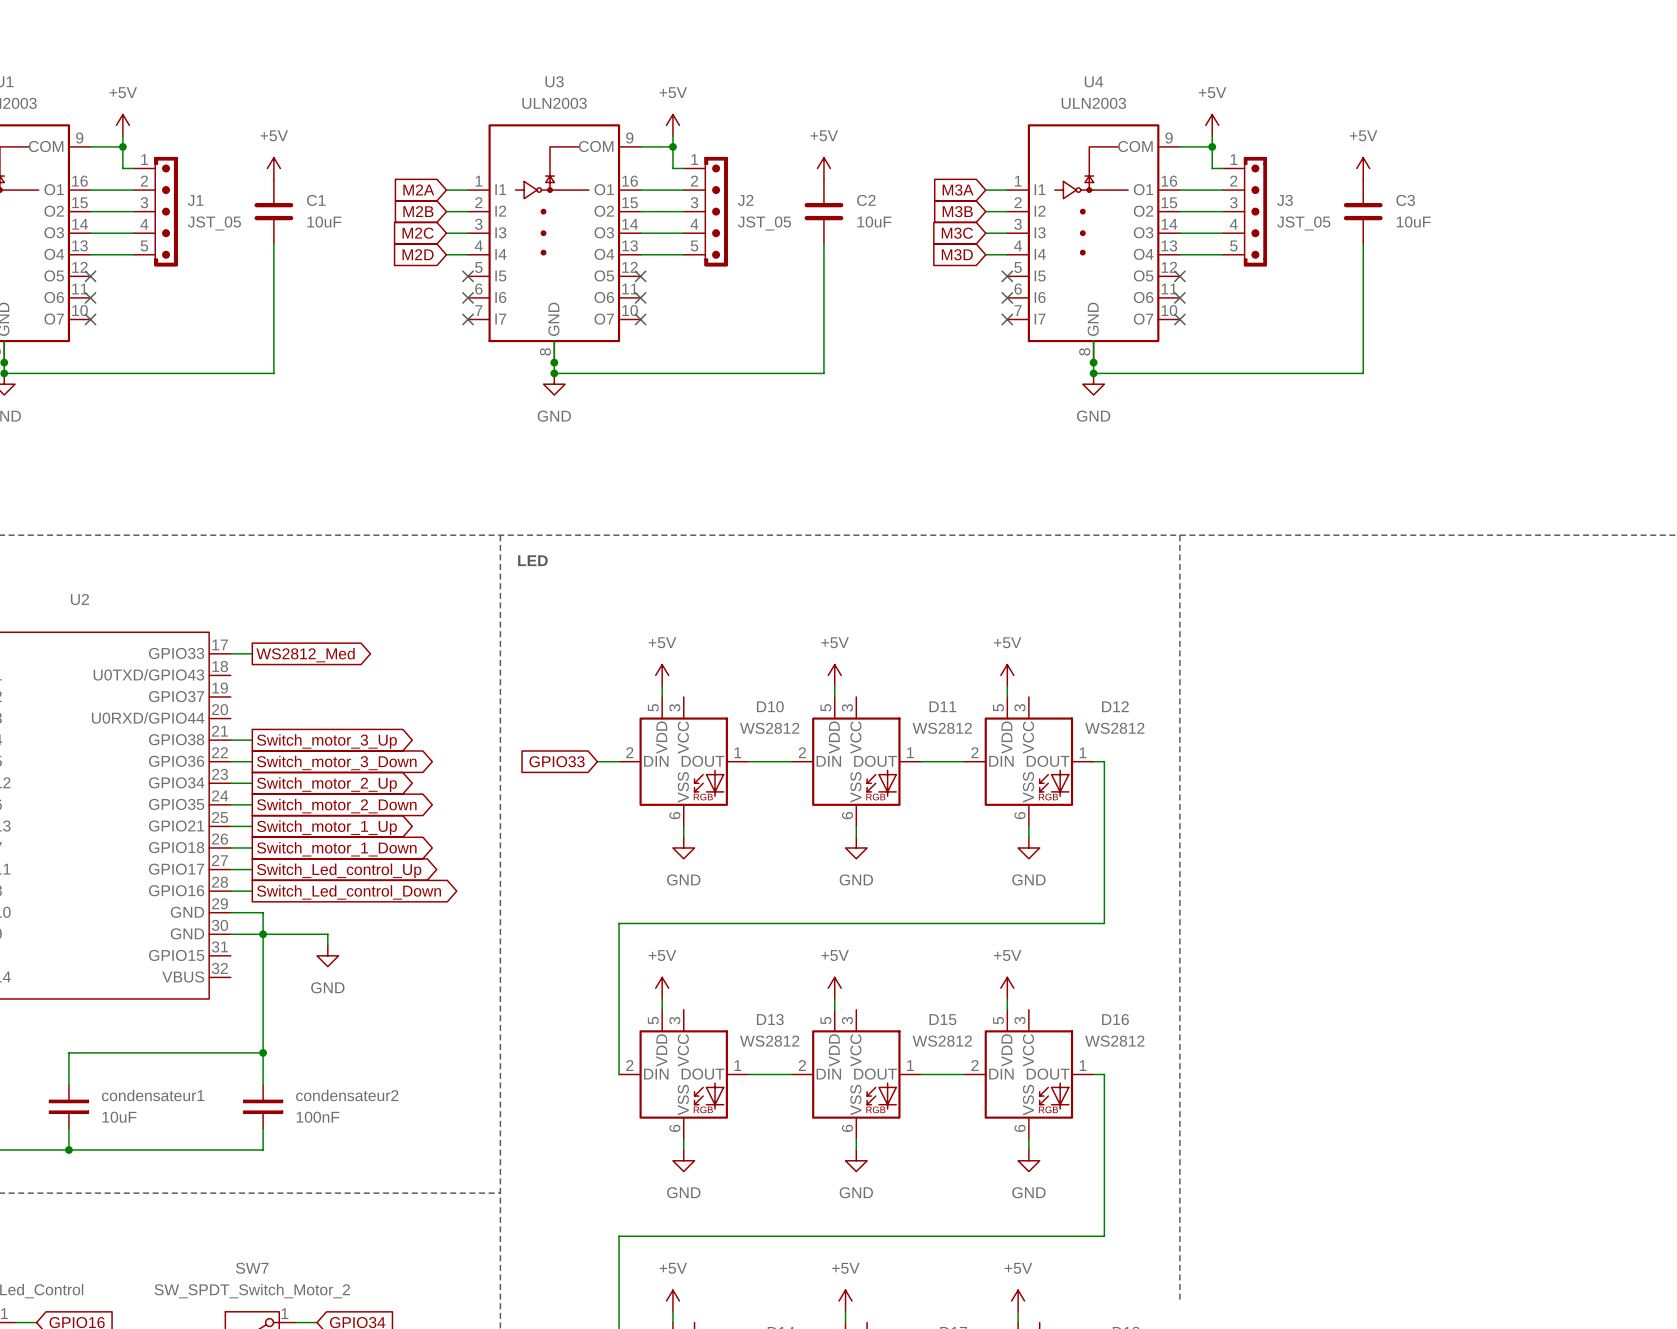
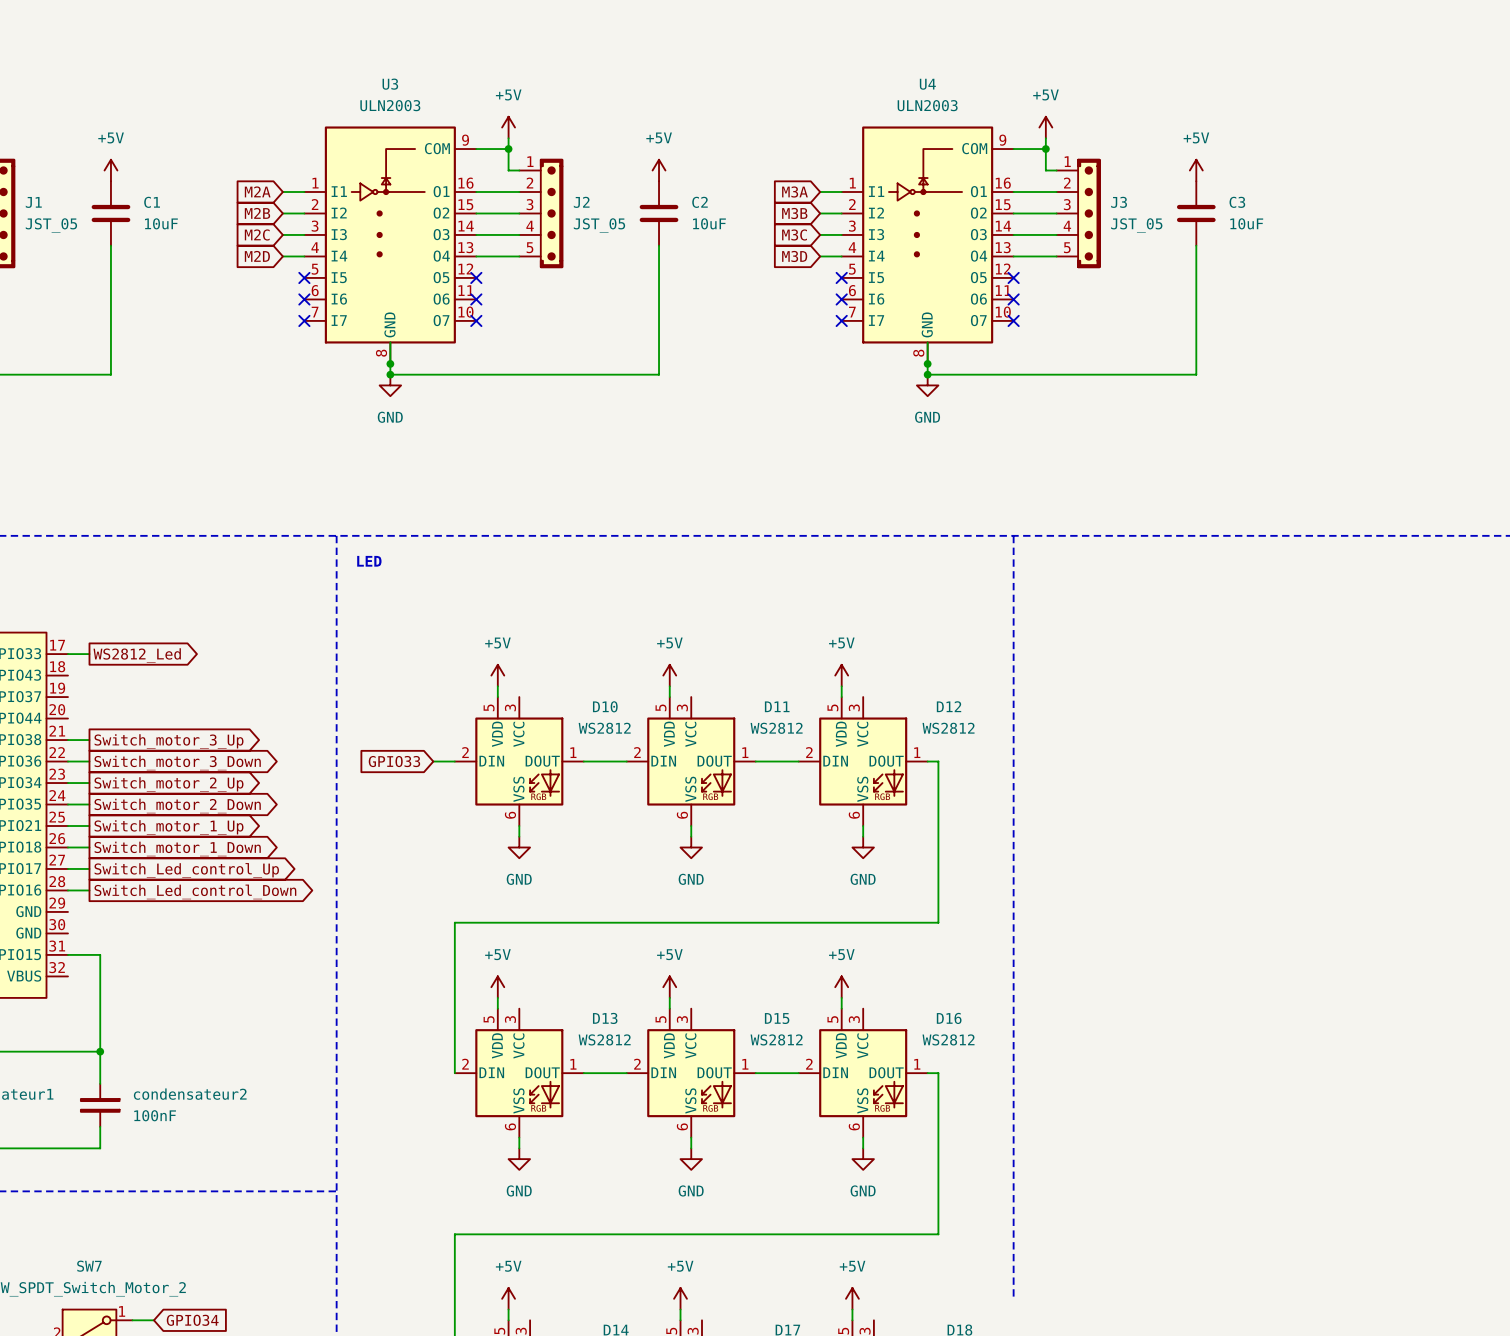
global label: WS2812_Med (305, 655) -> WS2812_Led (137, 655)
wire: (230, 912) (263, 912) (263, 955) -> (67, 954) (100, 954)
wire: (230, 934) (327, 934) (327, 945) -> none
junction: (263, 934) -> none
power symbol: GND (327, 955) -> none

